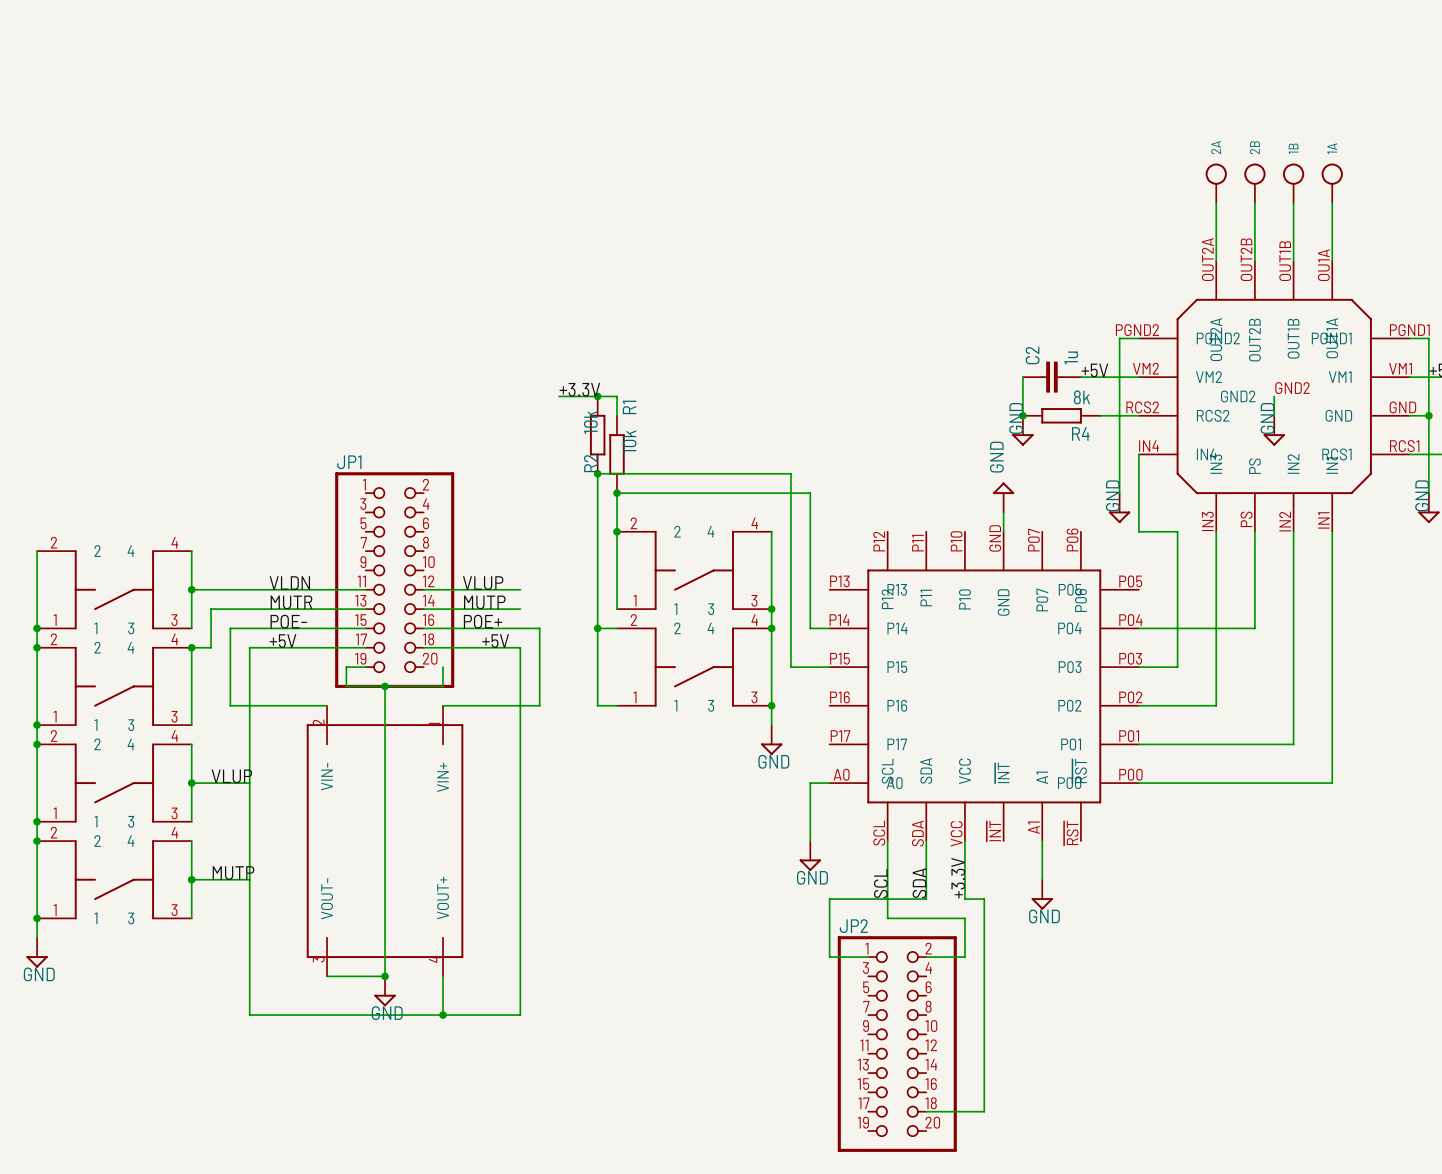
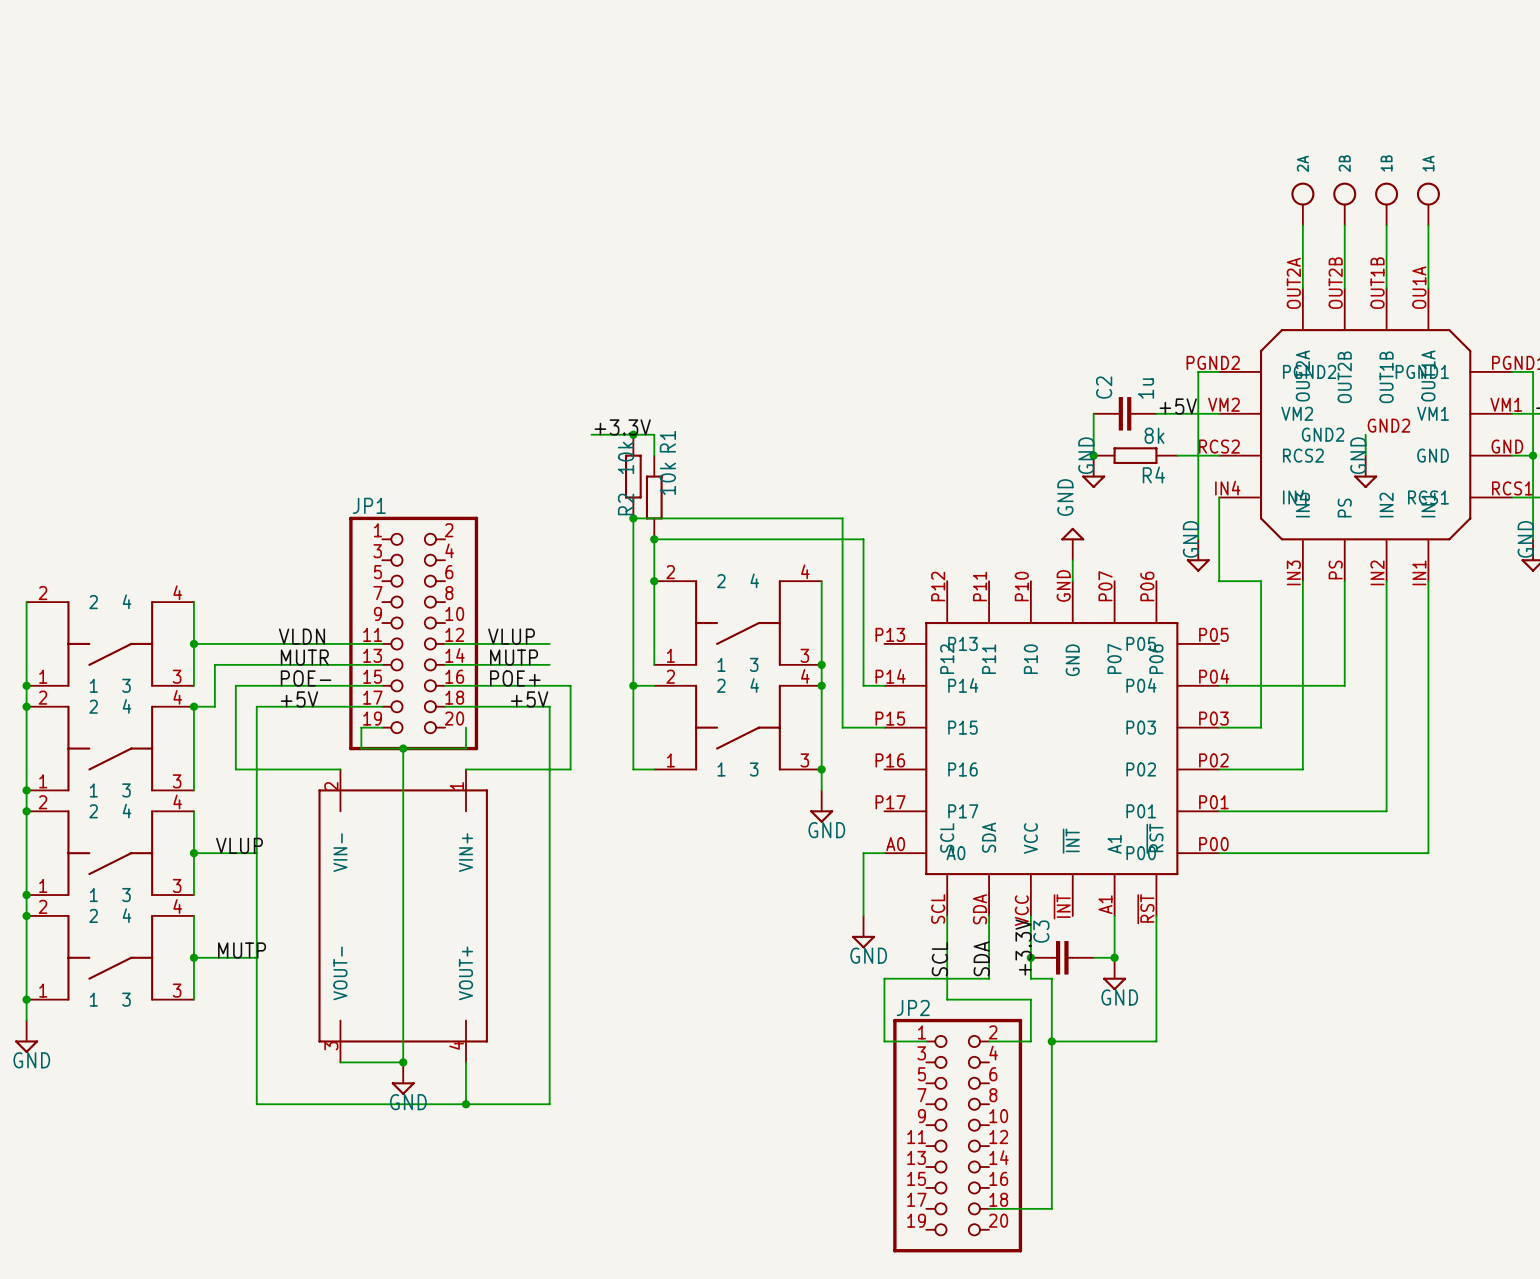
wire: none -> (1156, 915) (1156, 1041) (1051, 1041)
junction: none -> (1030, 957)
C3: none -> (1062, 957)
wire: none -> (1093, 957) (1114, 957)
junction: none -> (1114, 957)
junction: none -> (1051, 1041)

